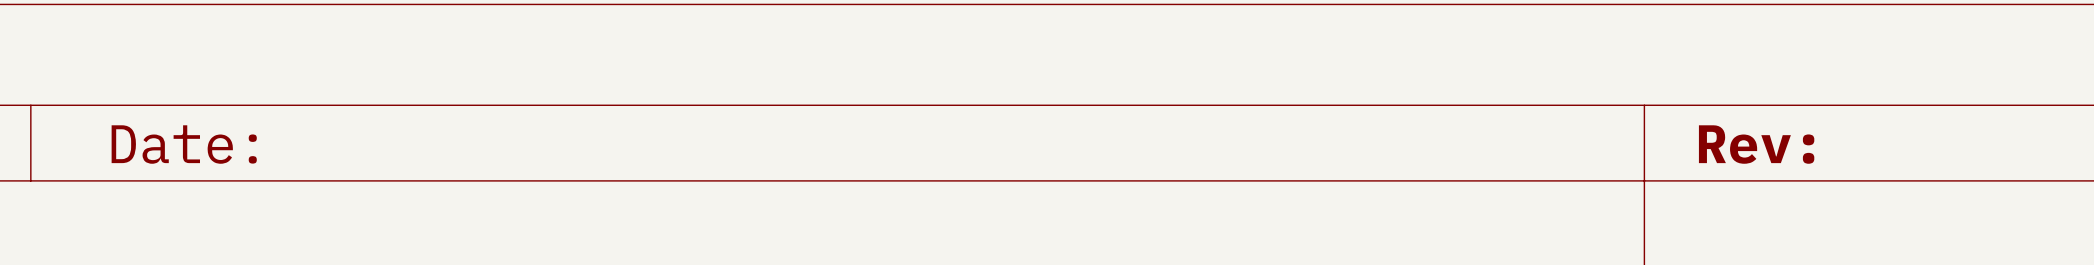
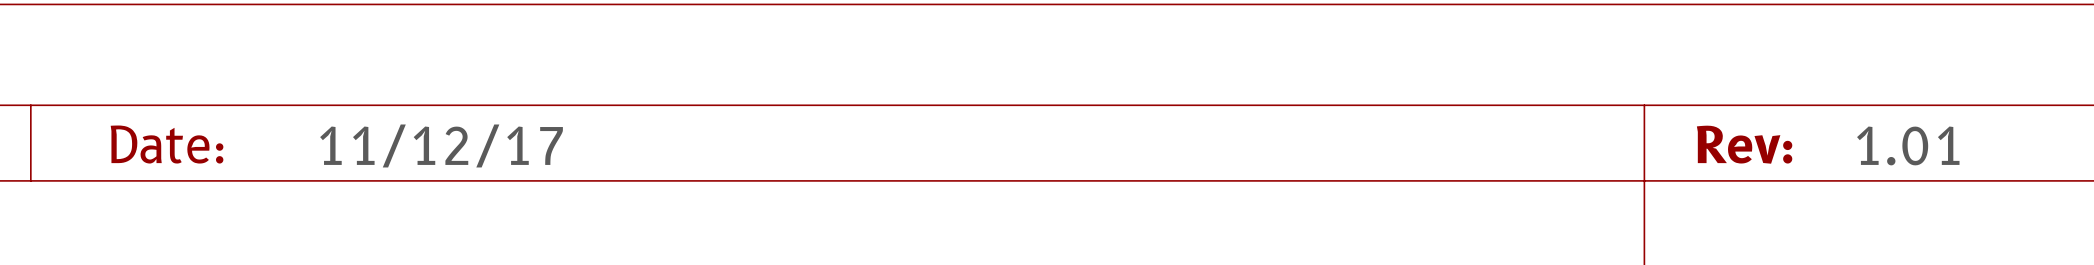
text: none -> 1.01 (1908, 145)
text: none -> 11/12/17 (441, 145)

